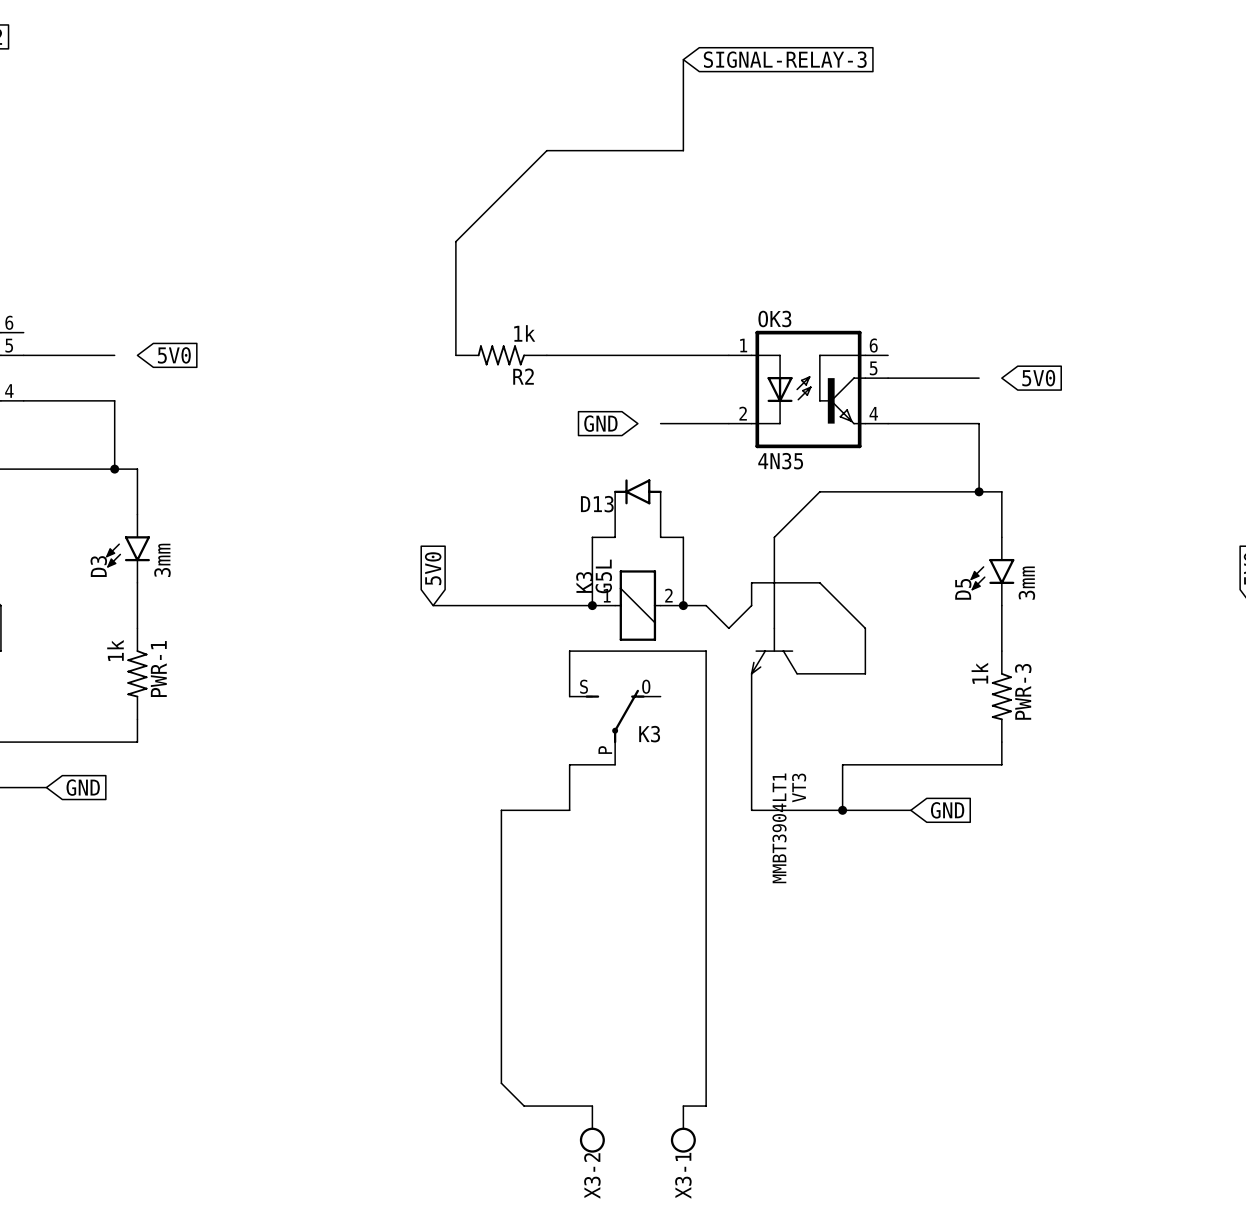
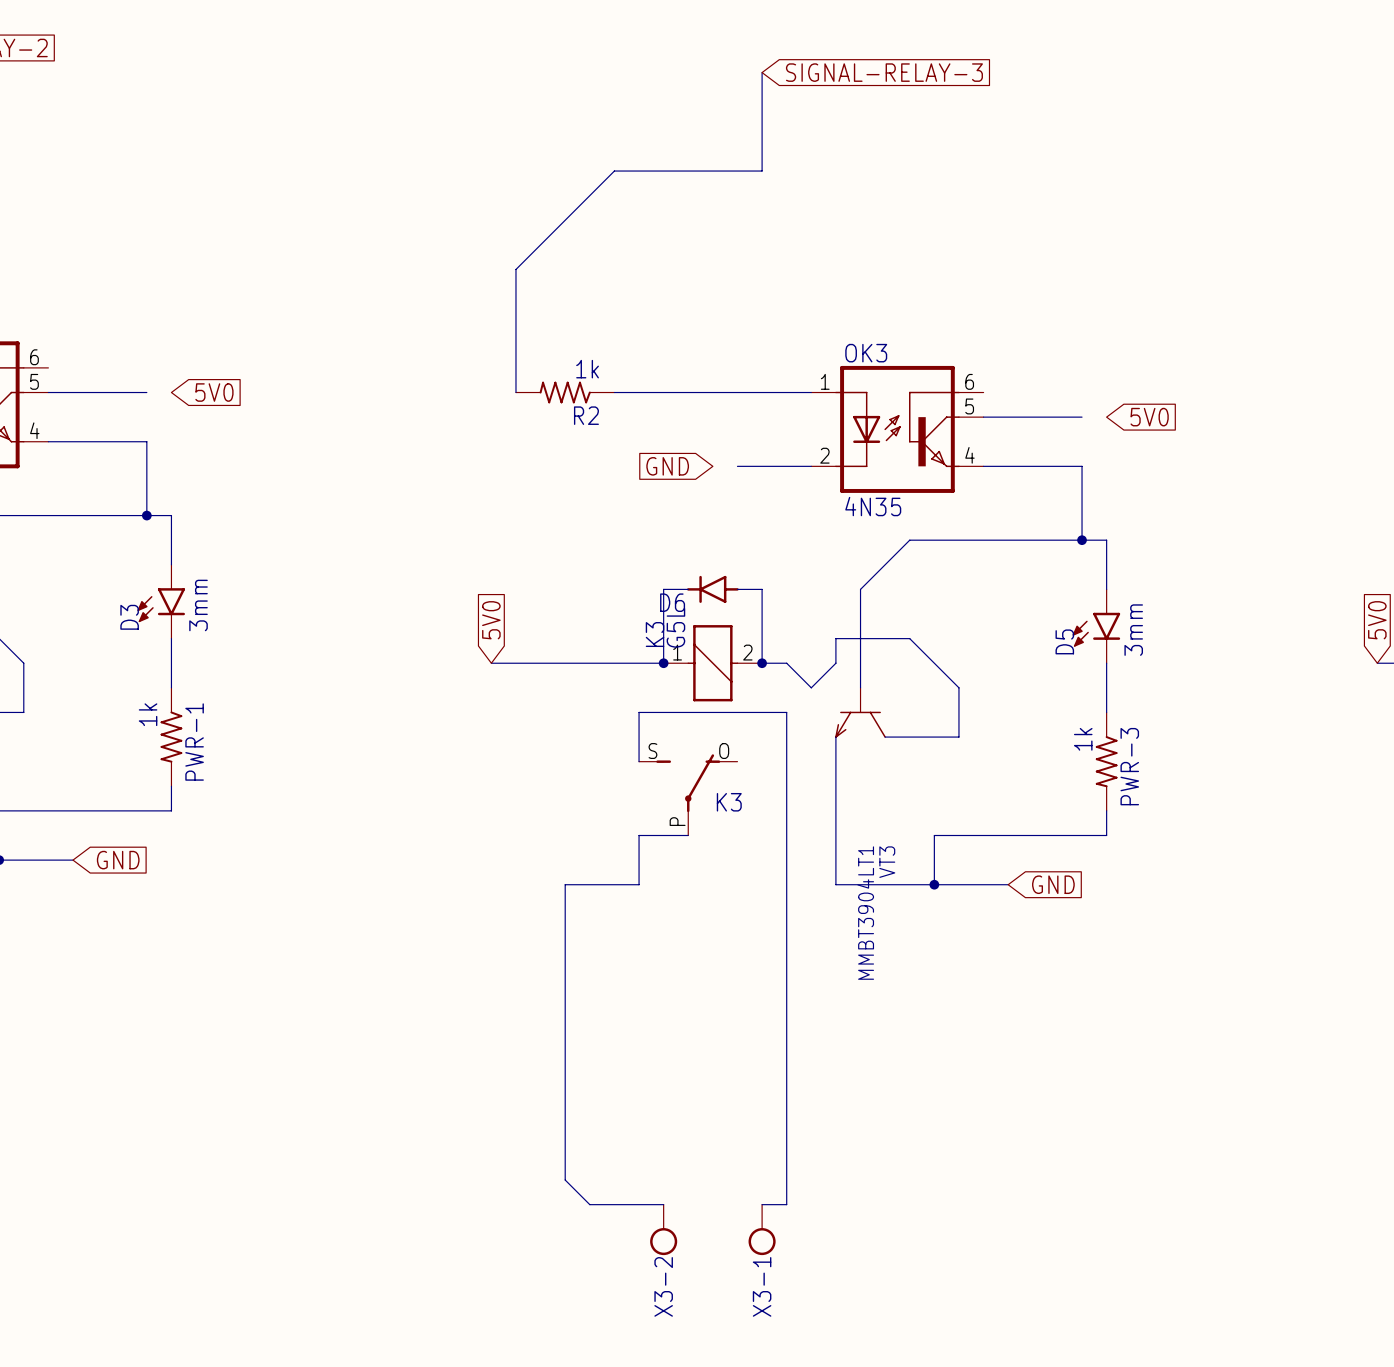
wire: (615, 491) (615, 537) -> none
D13: (637, 491) -> none
wire: (660, 491) (660, 537) -> none
D6: none -> (712, 589)

